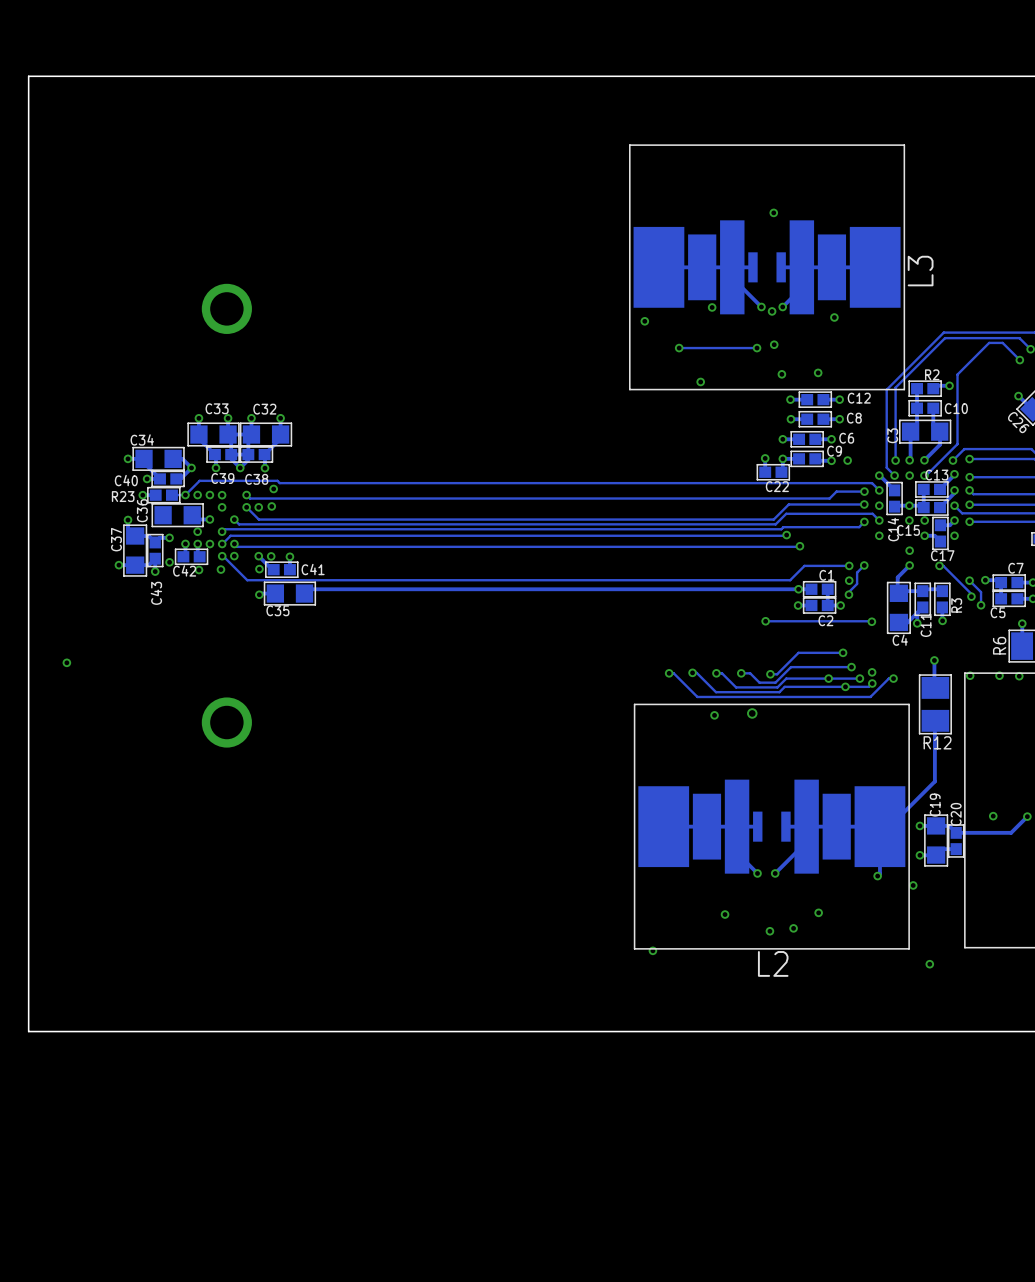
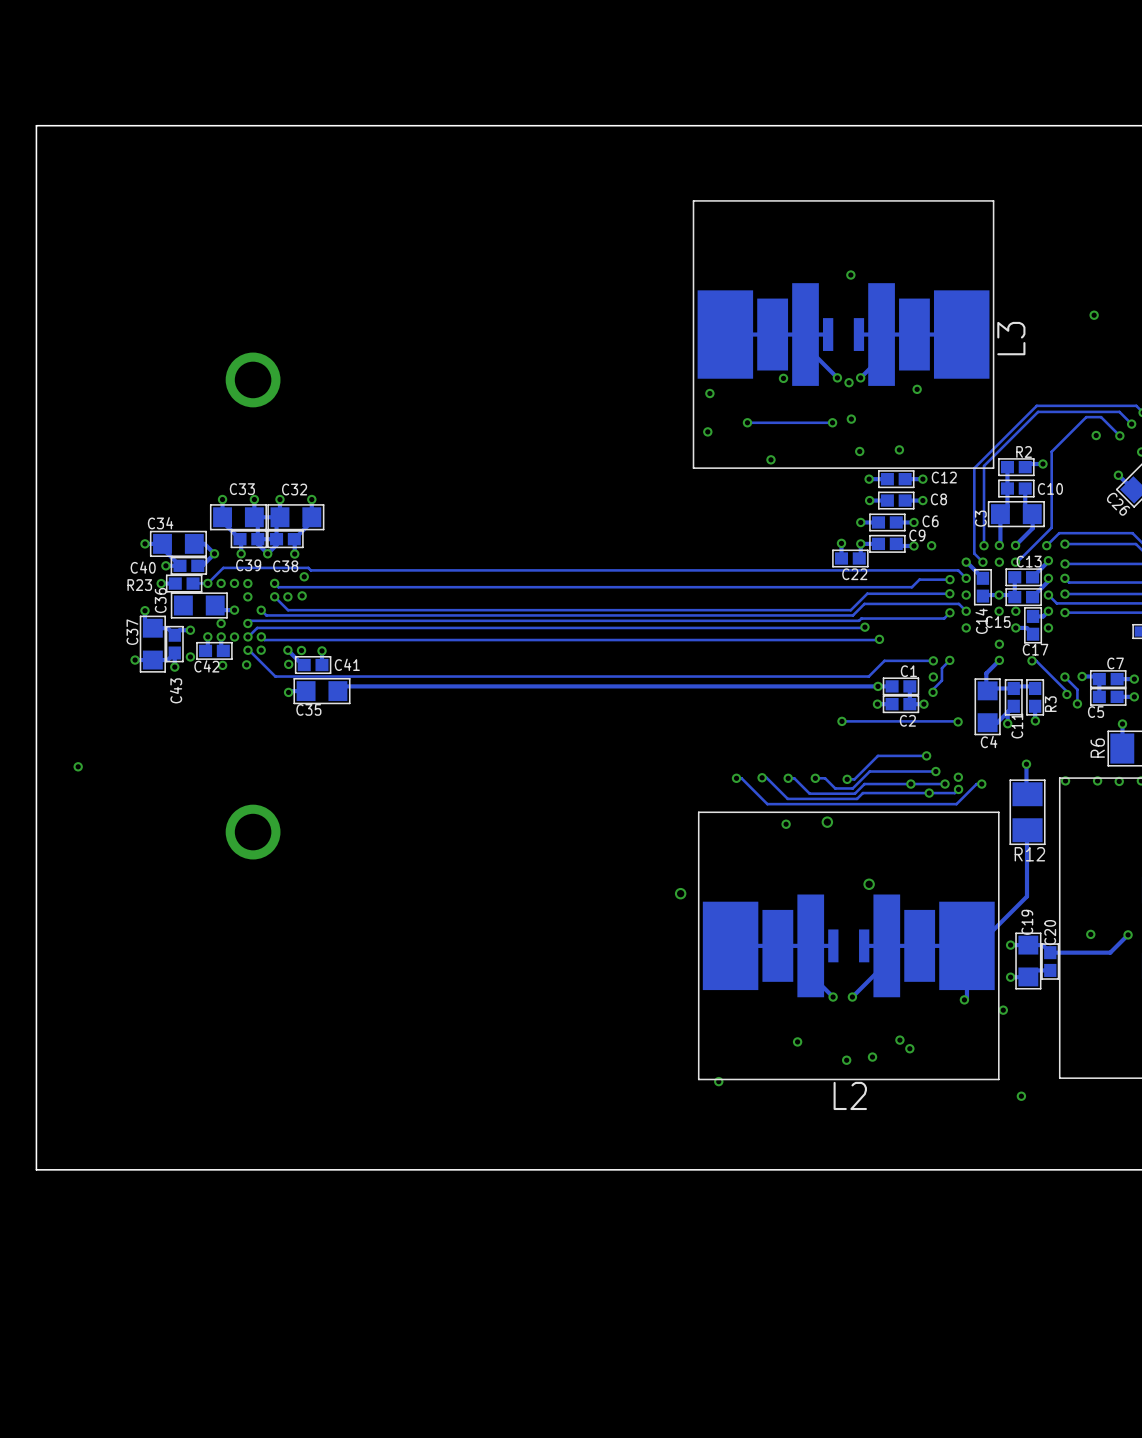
via: none -> (1094, 315)
via: none -> (707, 431)
via: none -> (1096, 435)
via: none -> (869, 884)
via: none -> (680, 893)
via: none -> (909, 1048)

